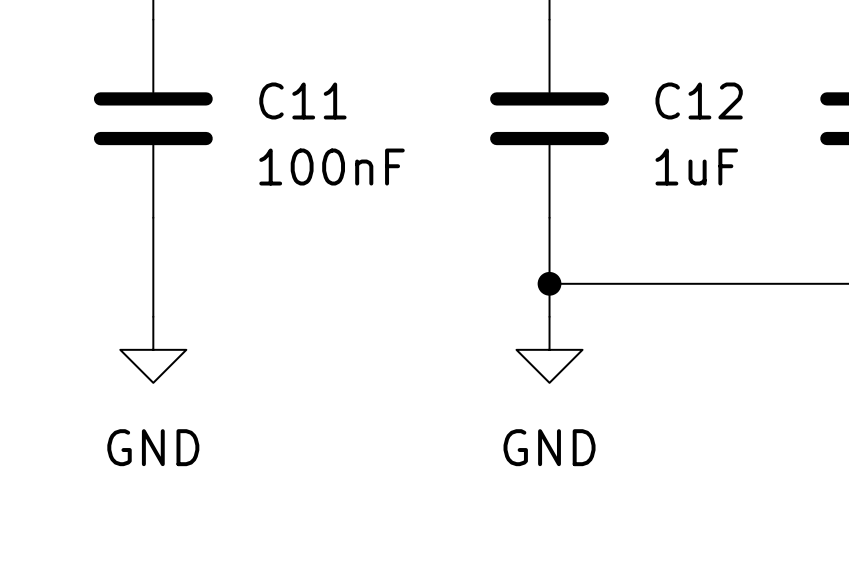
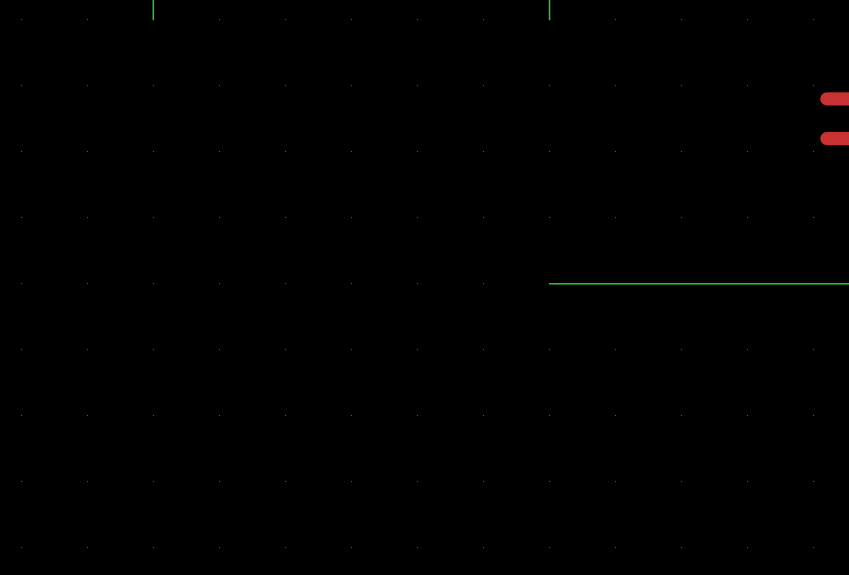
C11: 100nF (153, 118) -> none
C12: 1uF (549, 118) -> none
wire: (153, 217) (153, 316) -> none
wire: (549, 217) (549, 316) -> none
junction: (549, 283) -> none
power symbol: GND (153, 349) -> none
power symbol: GND (549, 349) -> none

